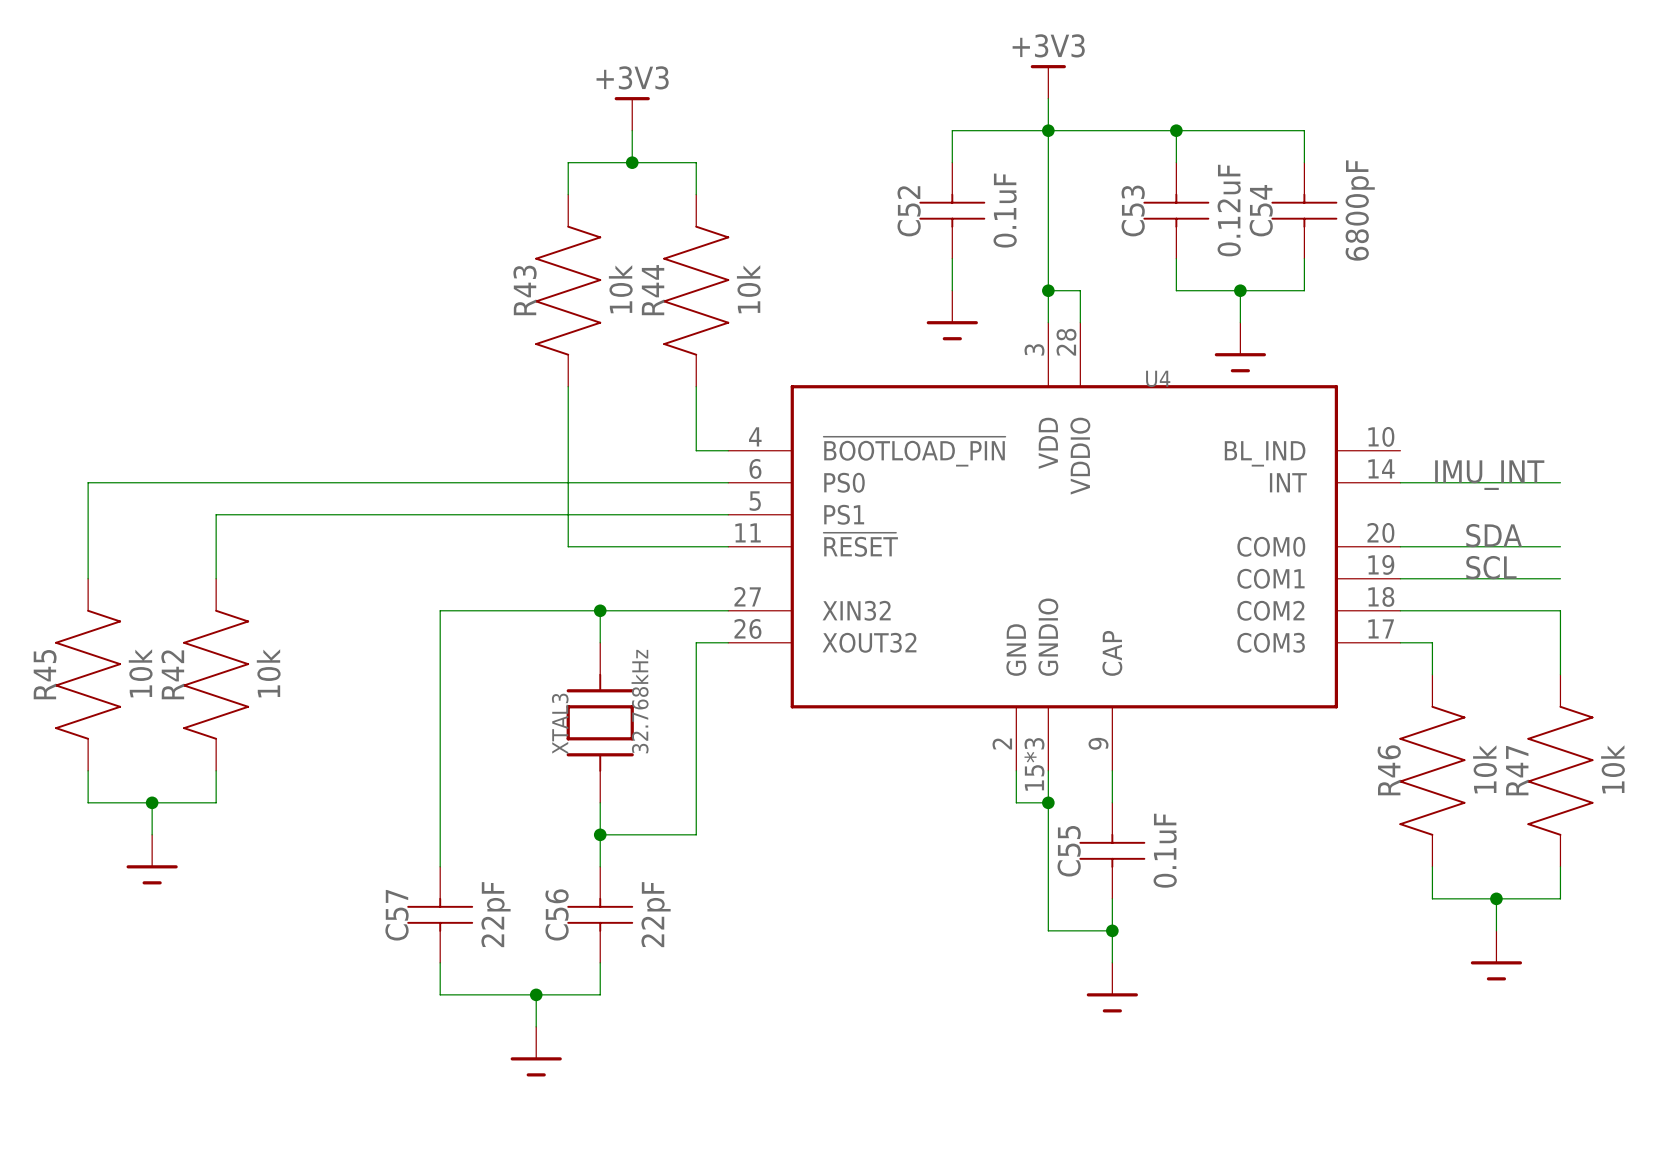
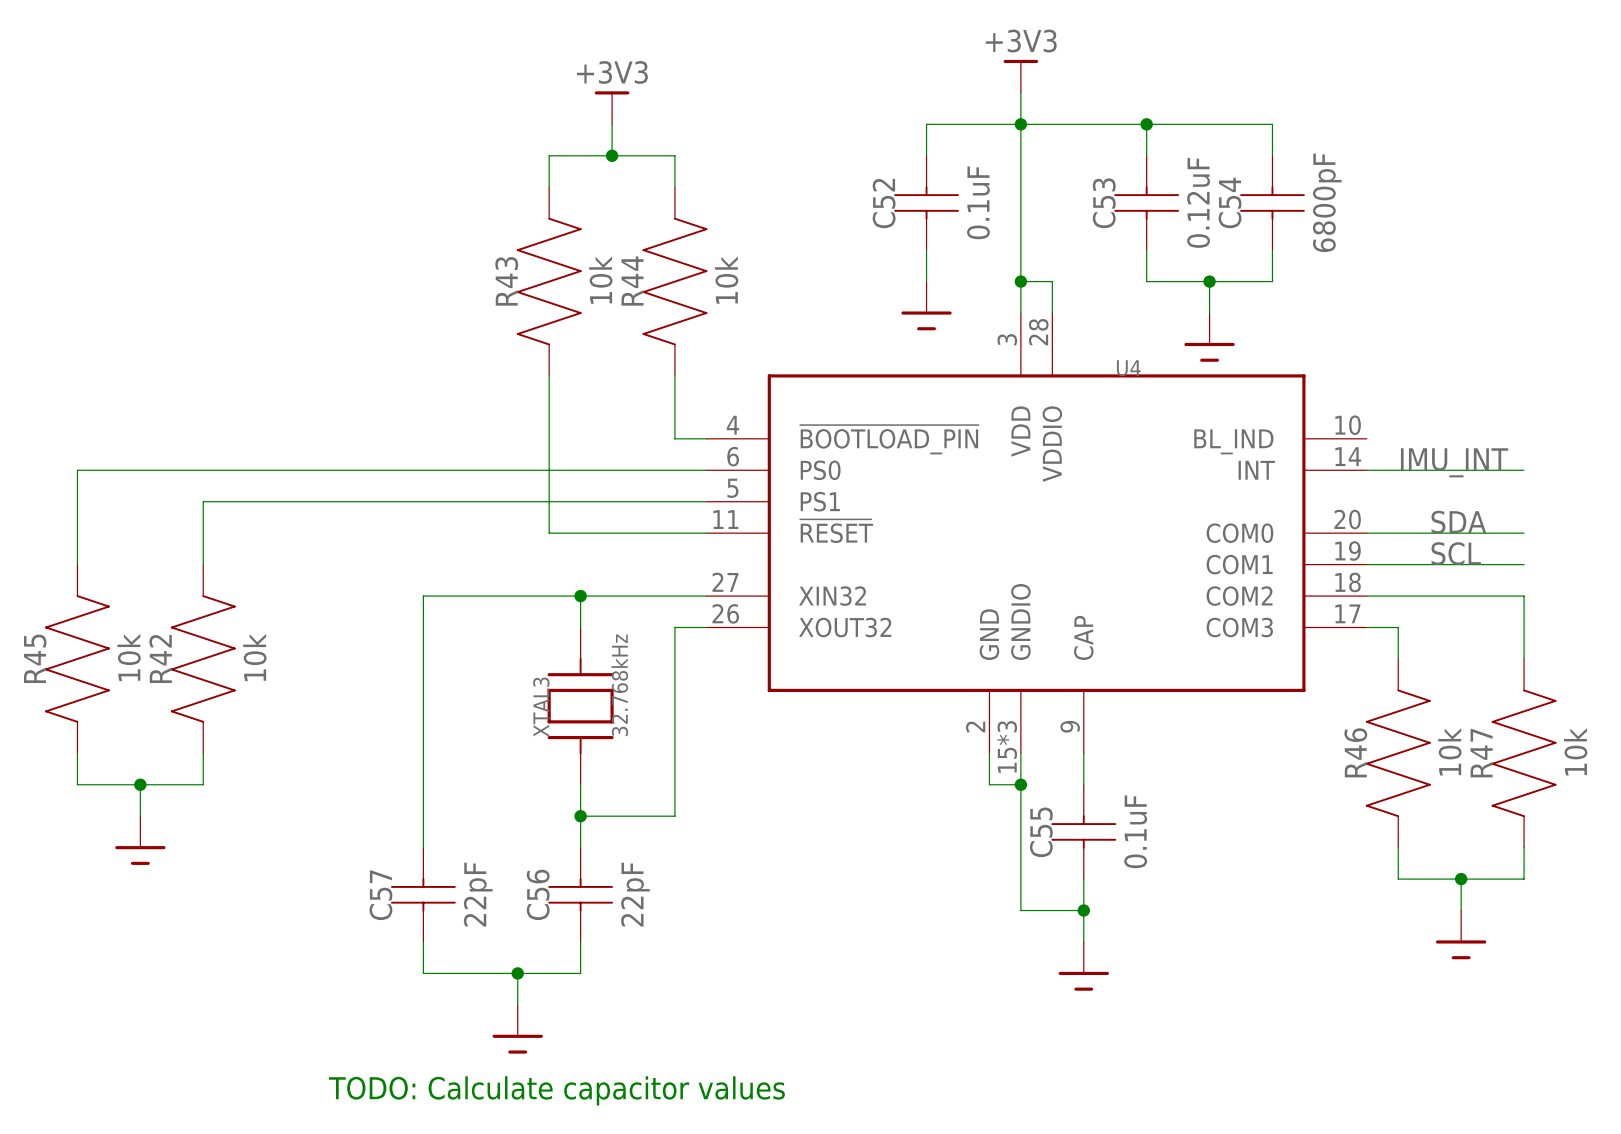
text: none -> TODO: Calculate capacitor values (556, 1090)

